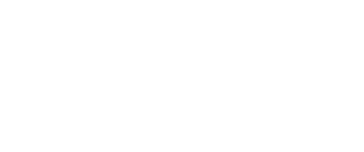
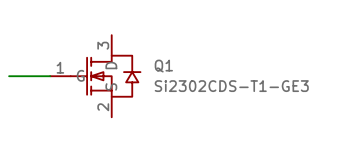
wire: none -> (9, 76) (50, 76)
Q1: none -> Si2302CDS-T1-GE3 (95, 76)

